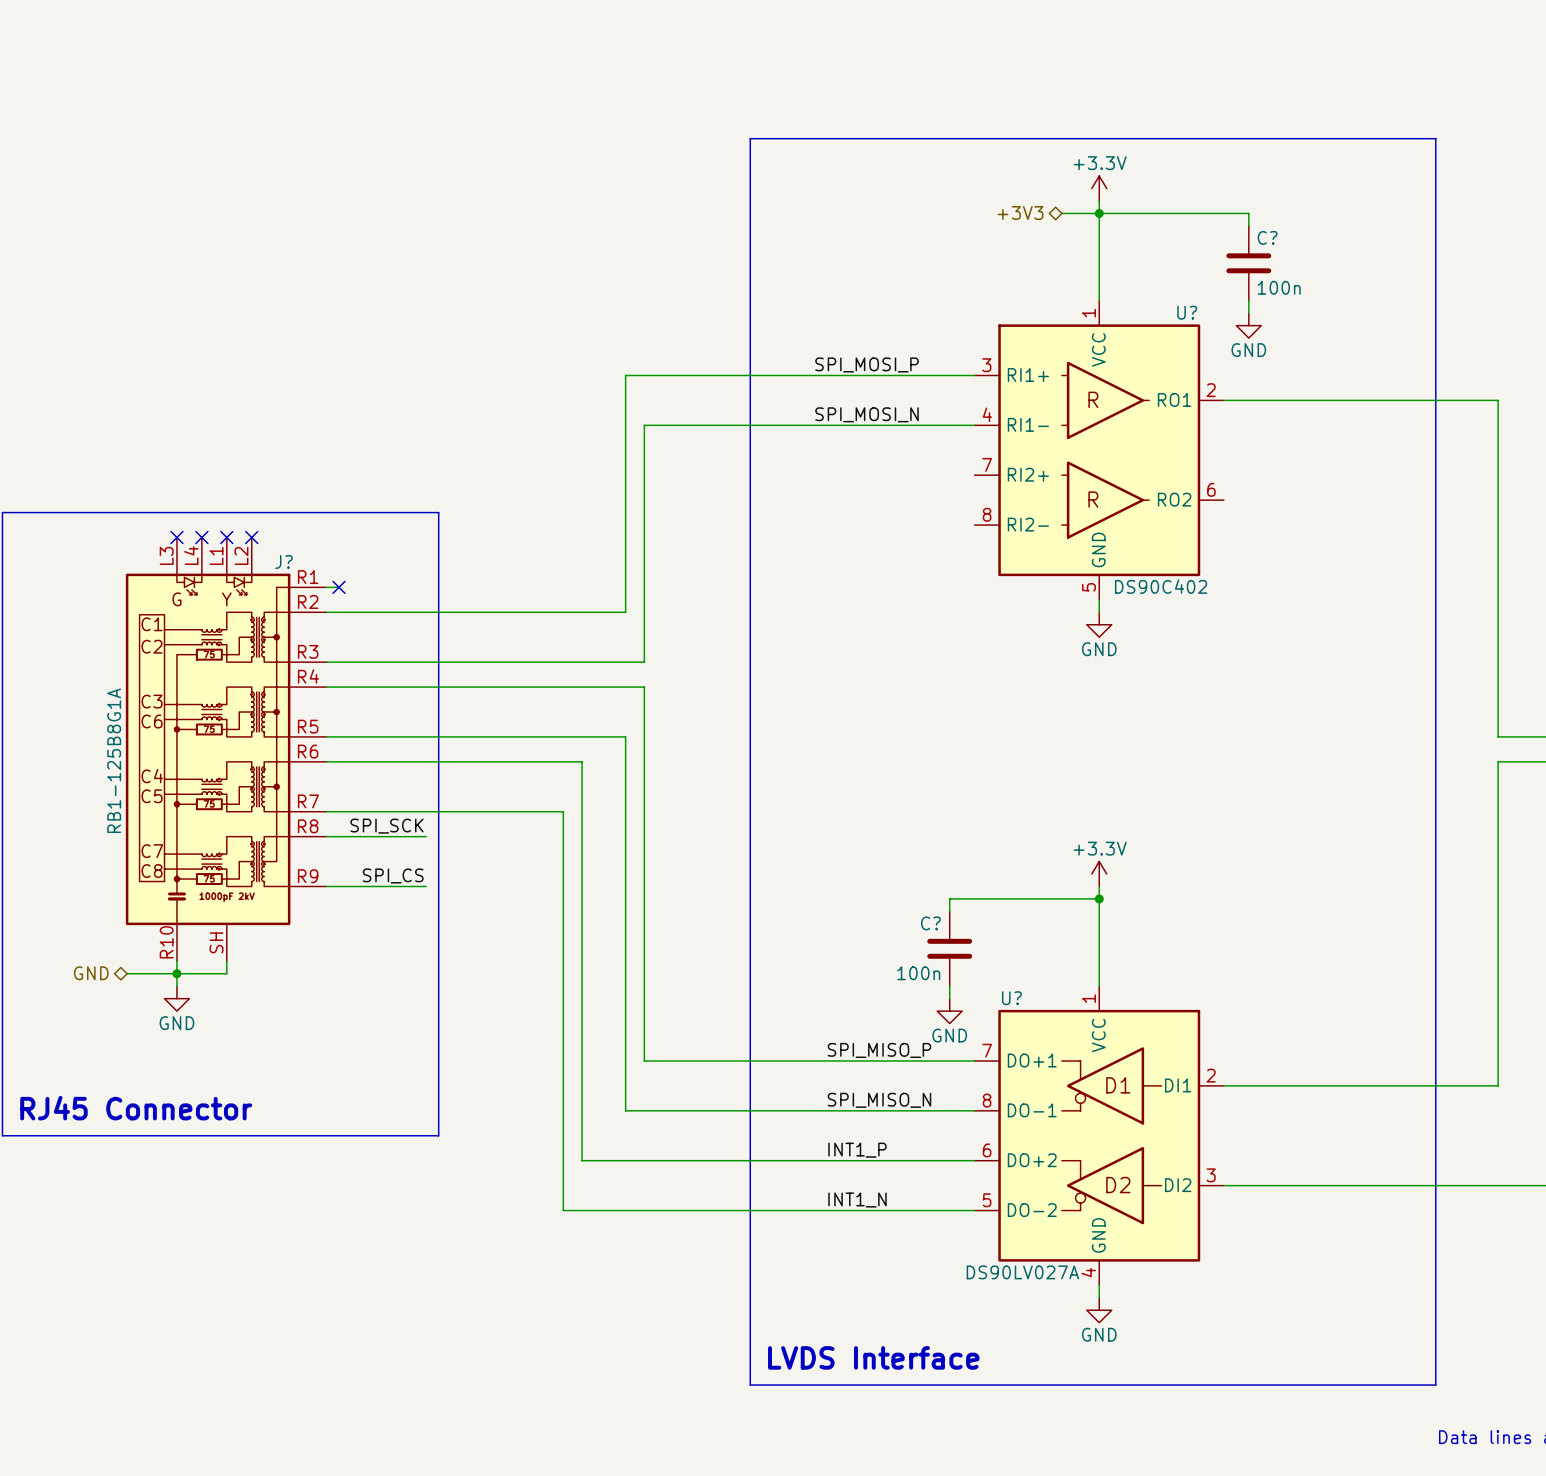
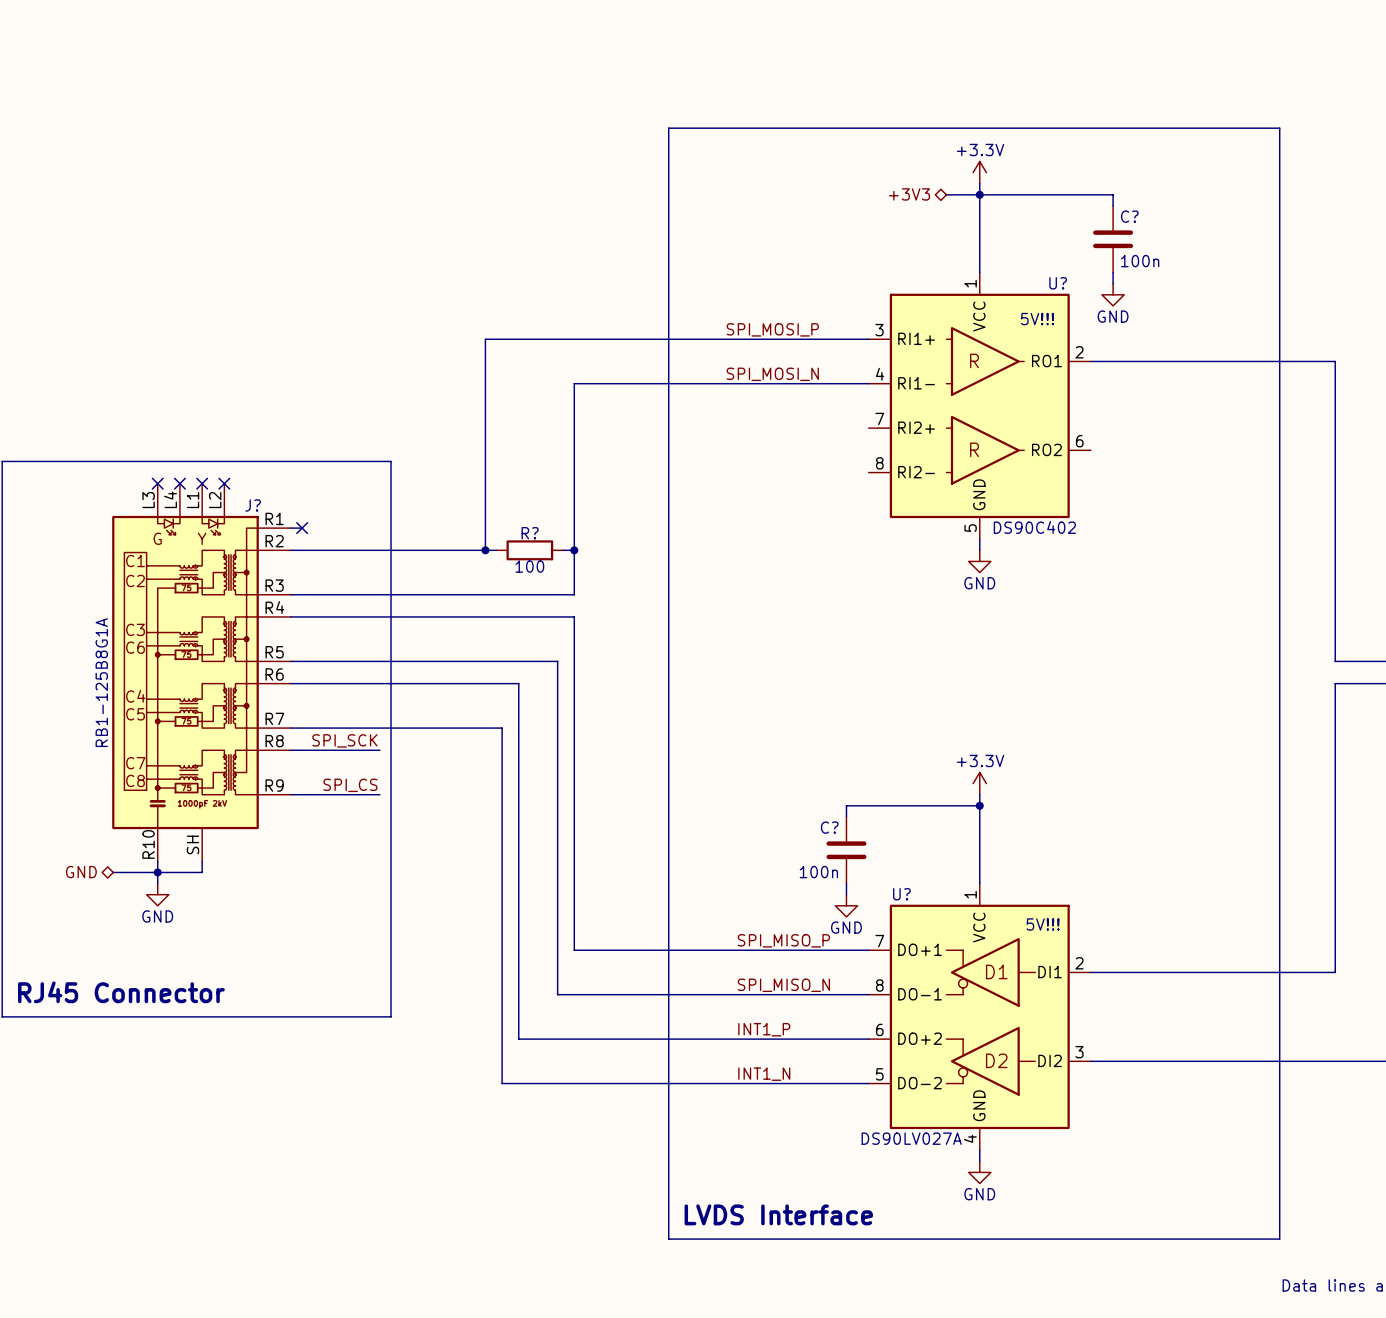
text: none -> 5V!!! (1037, 319)
wire: (625, 375) (625, 612) (557, 612) -> (557, 339) (485, 339) (485, 550)
junction: none -> (485, 550)
R?: none -> 100 (529, 550)
wire: none -> (563, 550) (574, 550)
junction: none -> (574, 550)
text: none -> 5V!!! (1043, 924)

